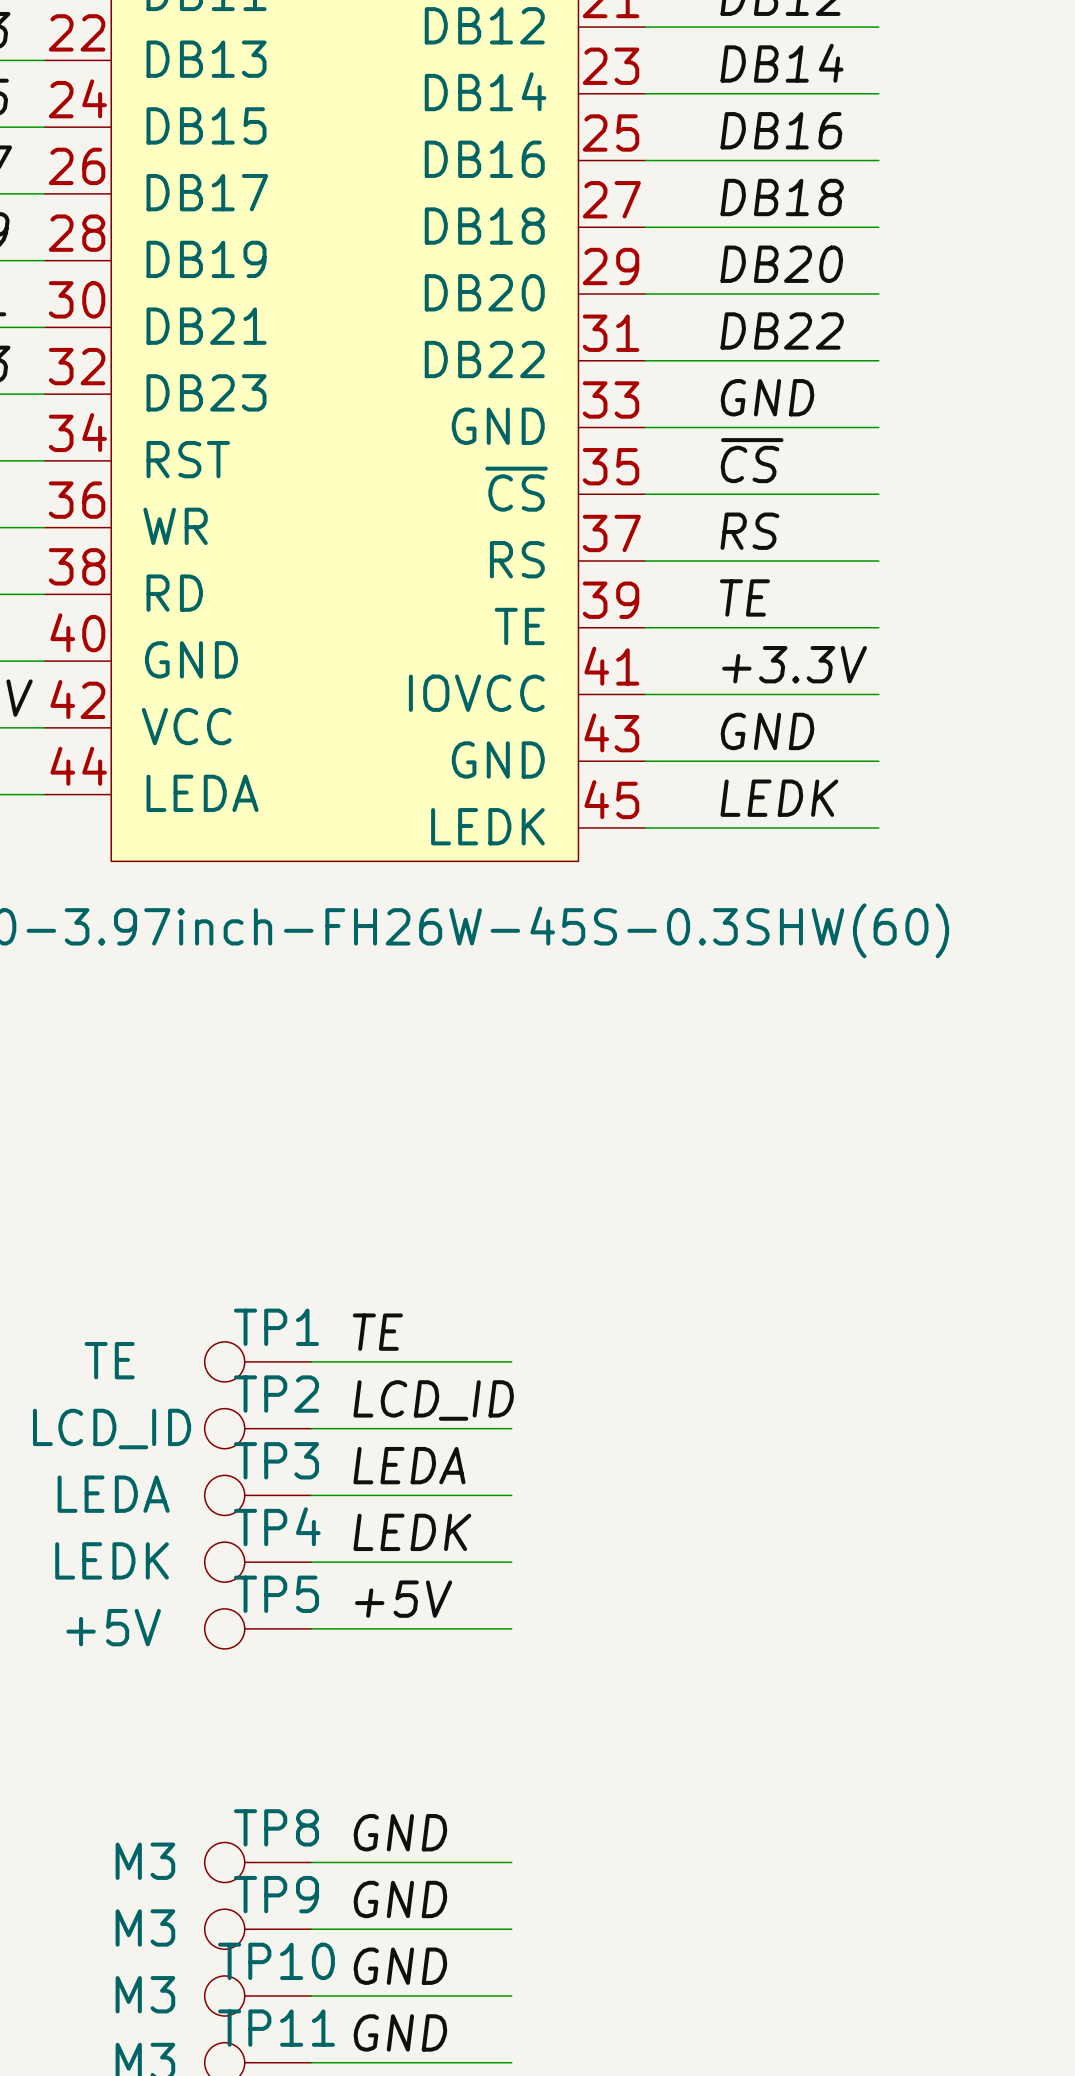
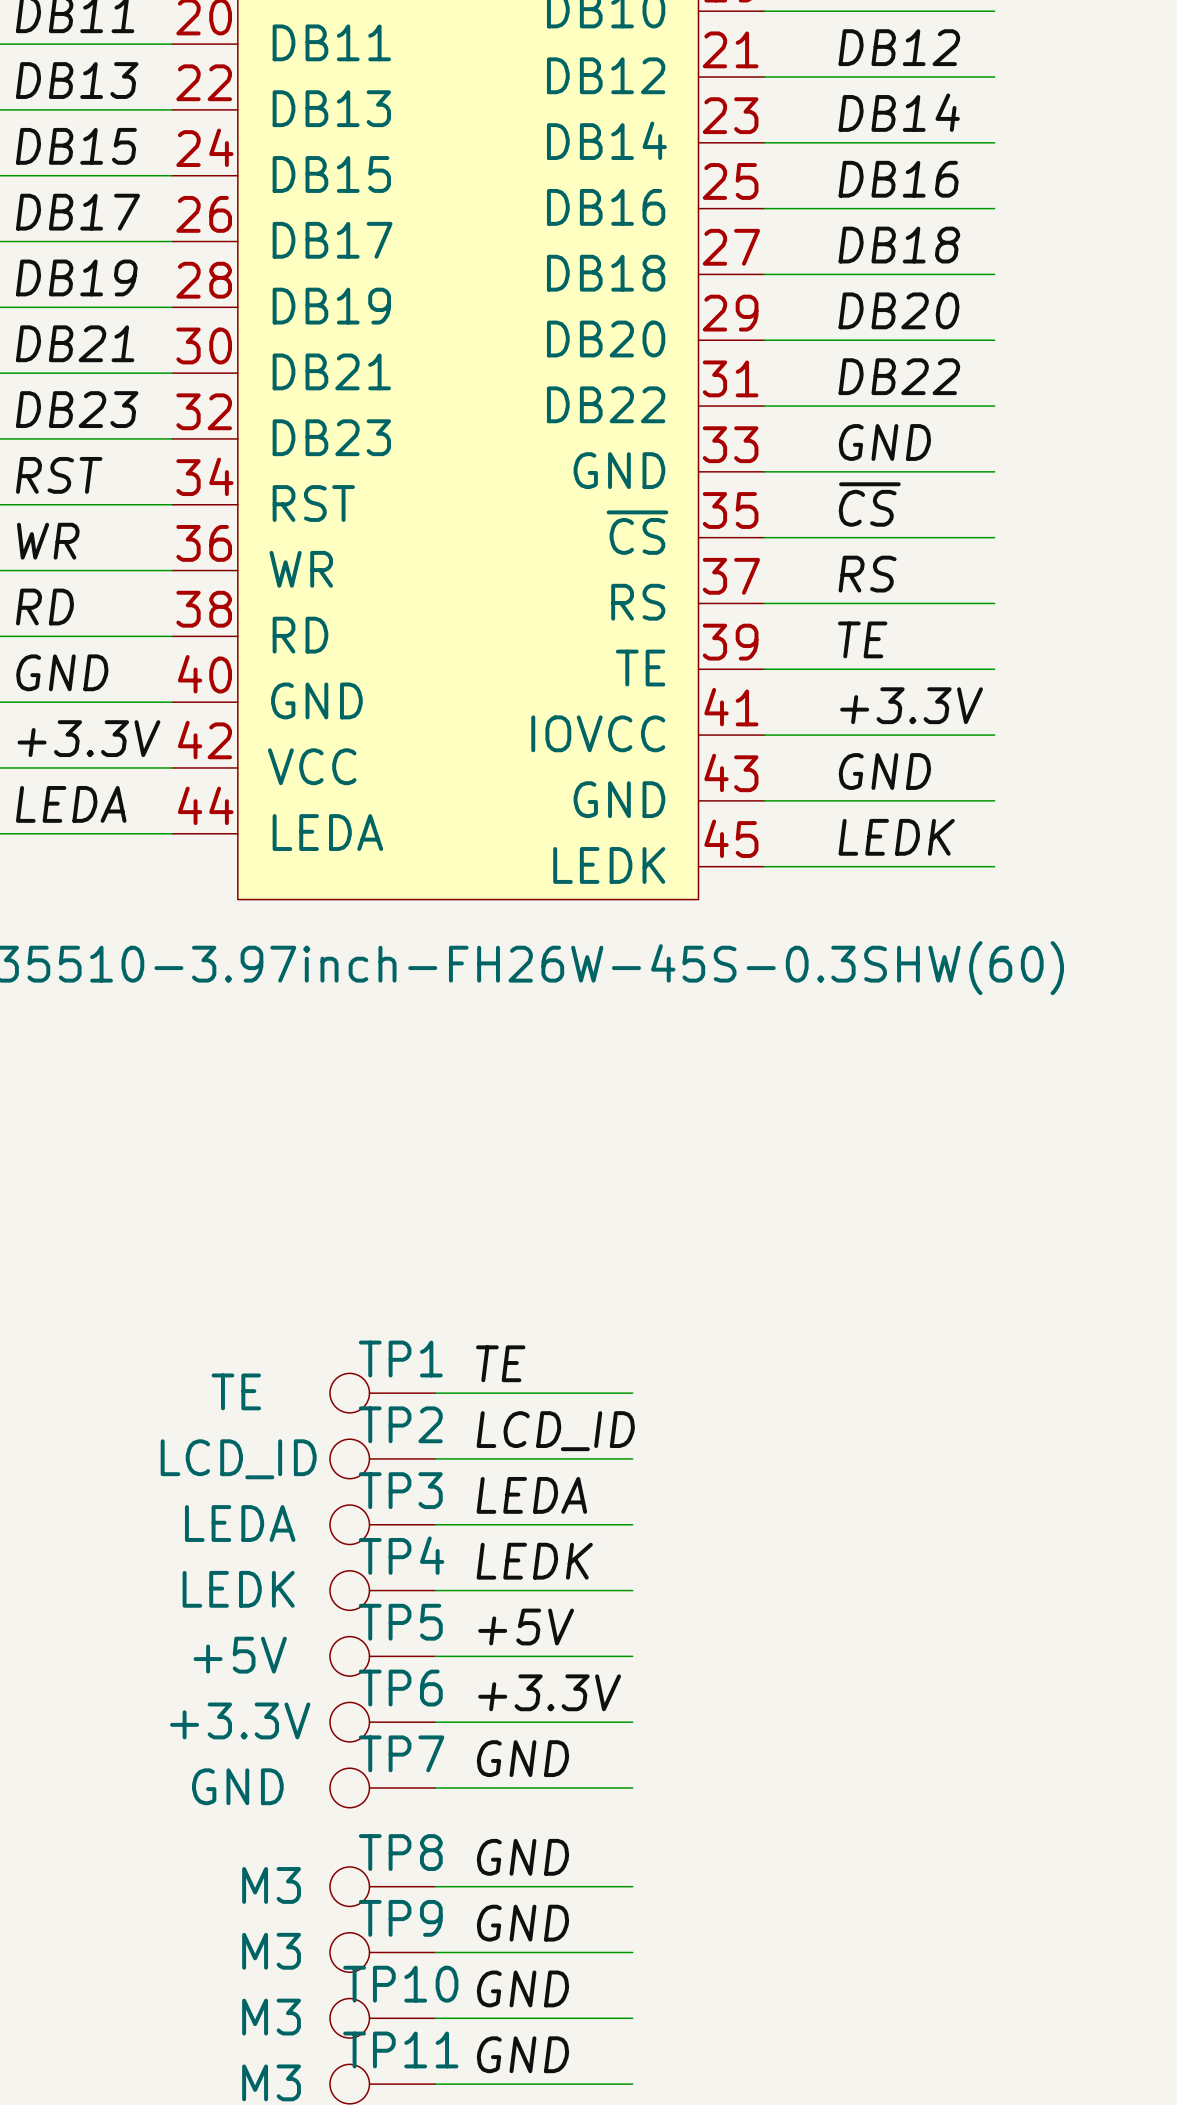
label: none -> +3.3V (549, 1692)
TP6: none -> +3.3V (382, 1722)
wire: none -> (435, 1722) (632, 1722)
label: none -> GND (522, 1758)
TP7: none -> GND (382, 1787)
wire: none -> (435, 1787) (632, 1787)

